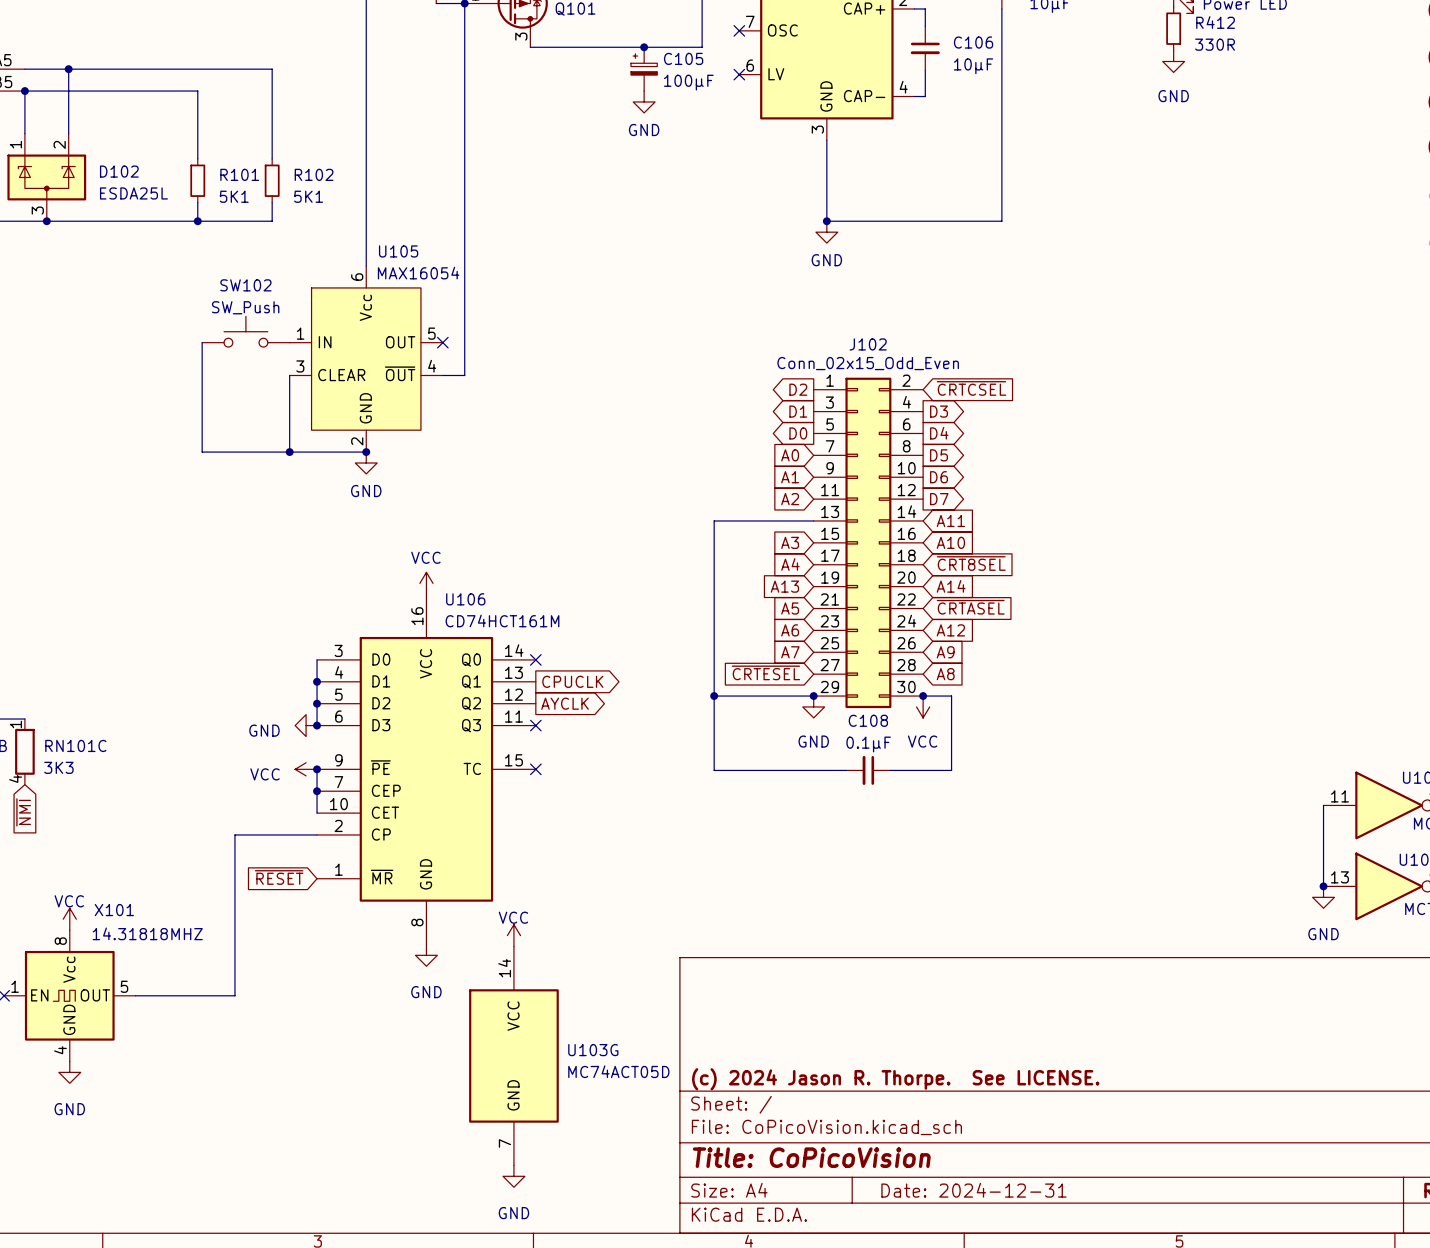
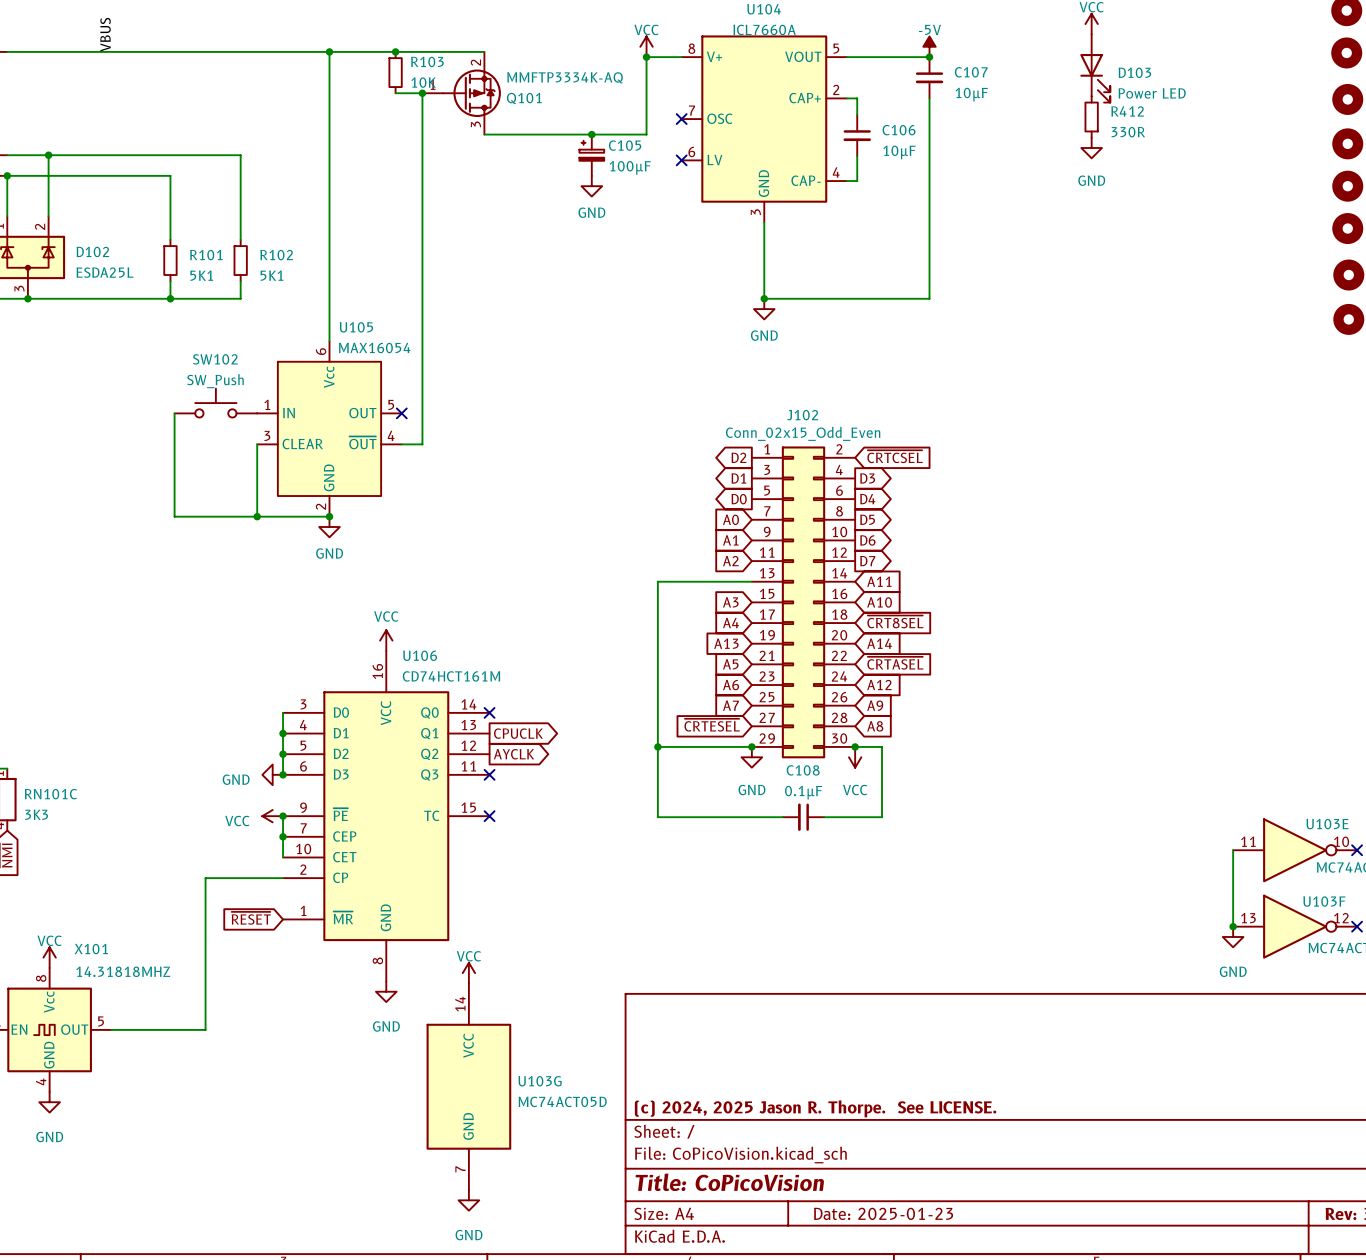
title block: (c) 2024 Jason R. Thorpe. See LICENSE. (895, 1079) -> (c) 2024, 2025 Jason R. Thorpe. See LICENSE. (815, 1108)
title block: Date: 2024-12-31 (973, 1190) -> Date: 2025-01-23 (883, 1213)

